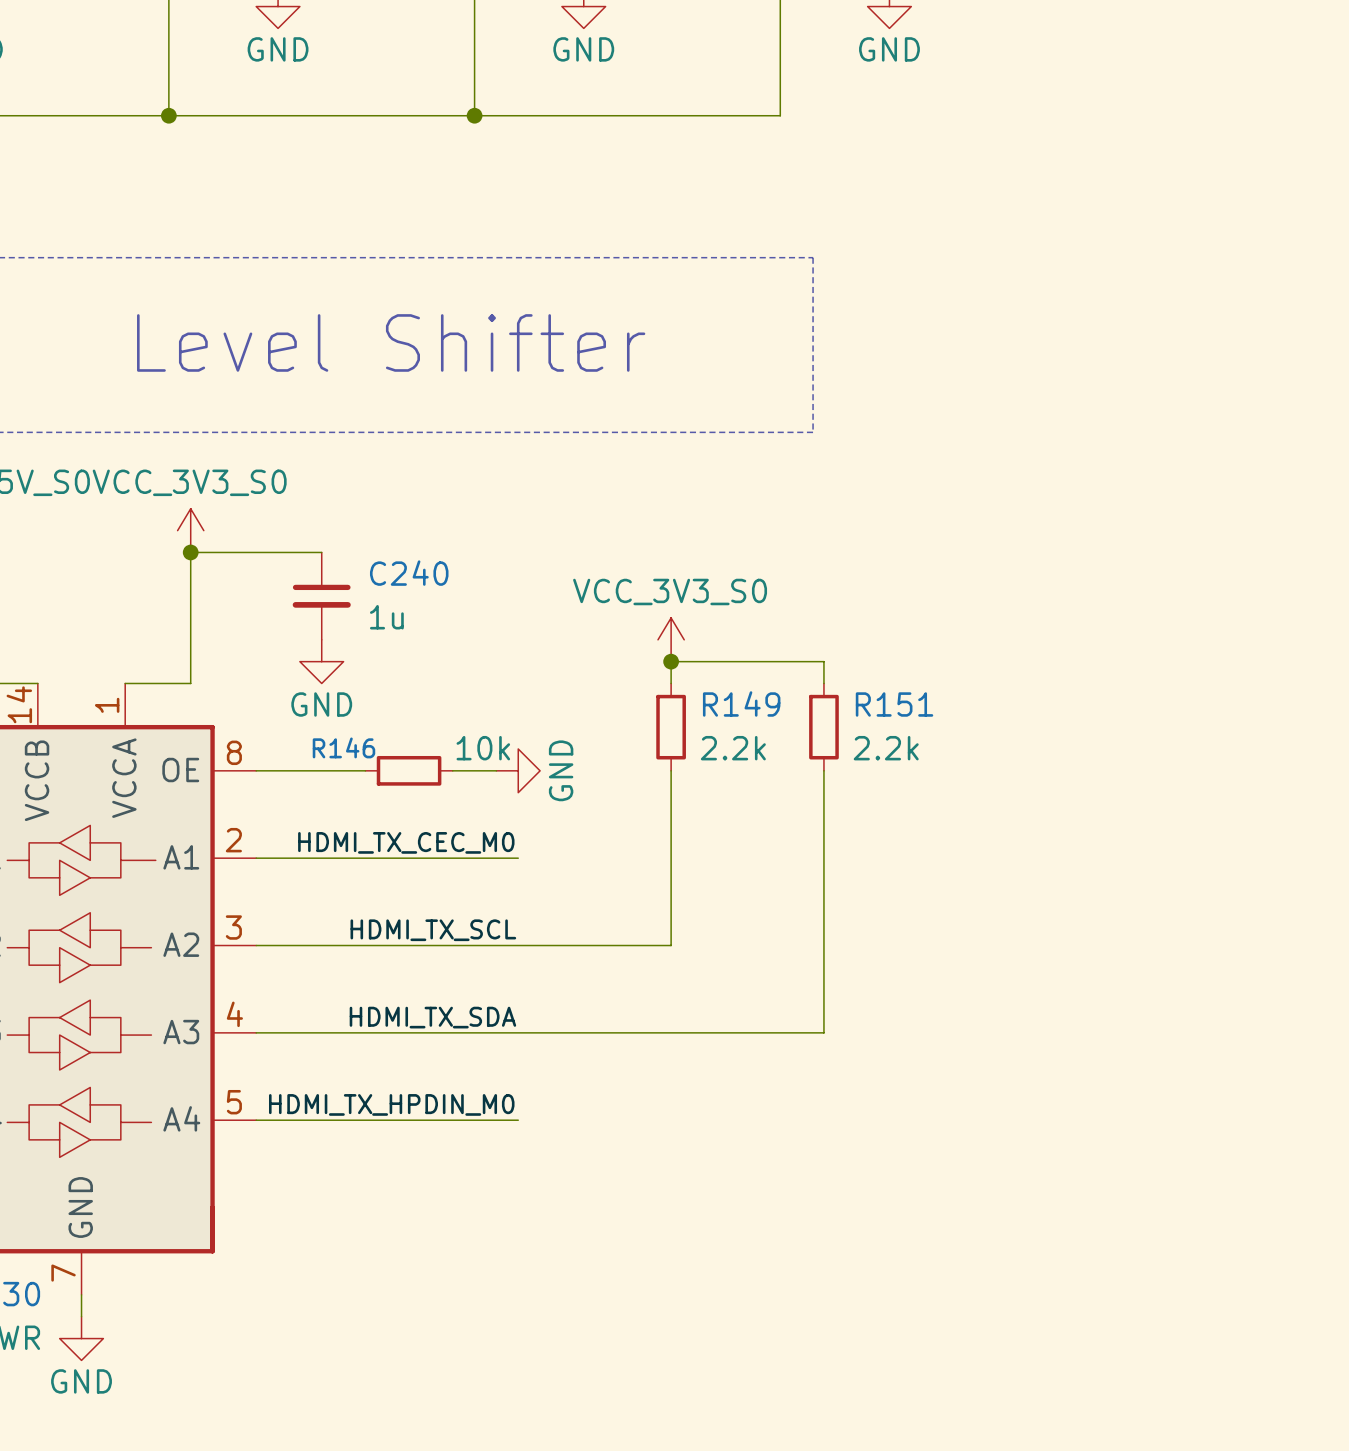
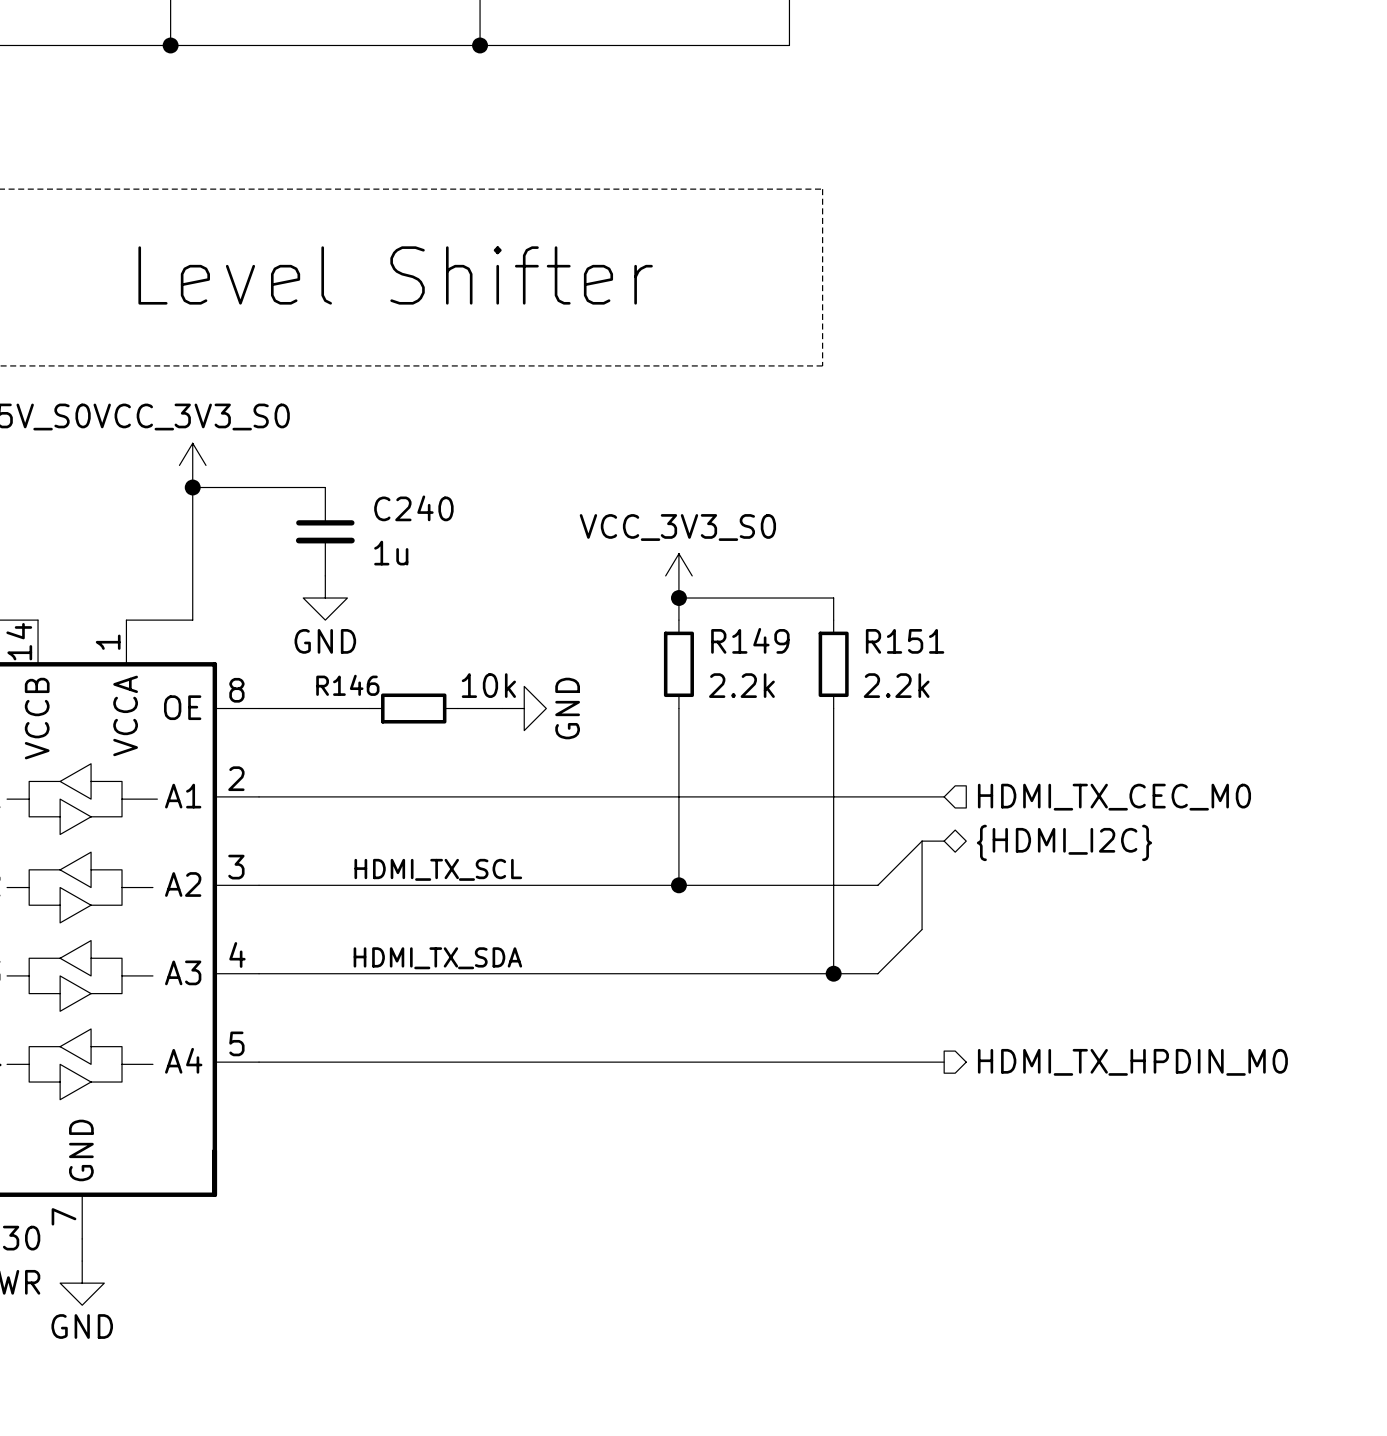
label: HDMI_TX_CEC_M0 (406, 842) -> none
wire: none -> (524, 796) (944, 796)
hierarchical label: none -> HDMI_TX_CEC_M0 (1114, 797)
wire: none -> (922, 841) (877, 885) (678, 885)
bus: none -> (944, 841) (922, 841) (922, 929)
hierarchical label: none -> {HDMI_I2C} (1064, 842)
junction: none -> (678, 885)
wire: none -> (922, 929) (877, 973) (833, 973)
junction: none -> (833, 973)
label: HDMI_TX_HPDIN_M0 (391, 1104) -> none
wire: none -> (524, 1062) (944, 1062)
hierarchical label: none -> HDMI_TX_HPDIN_M0 (1132, 1062)

